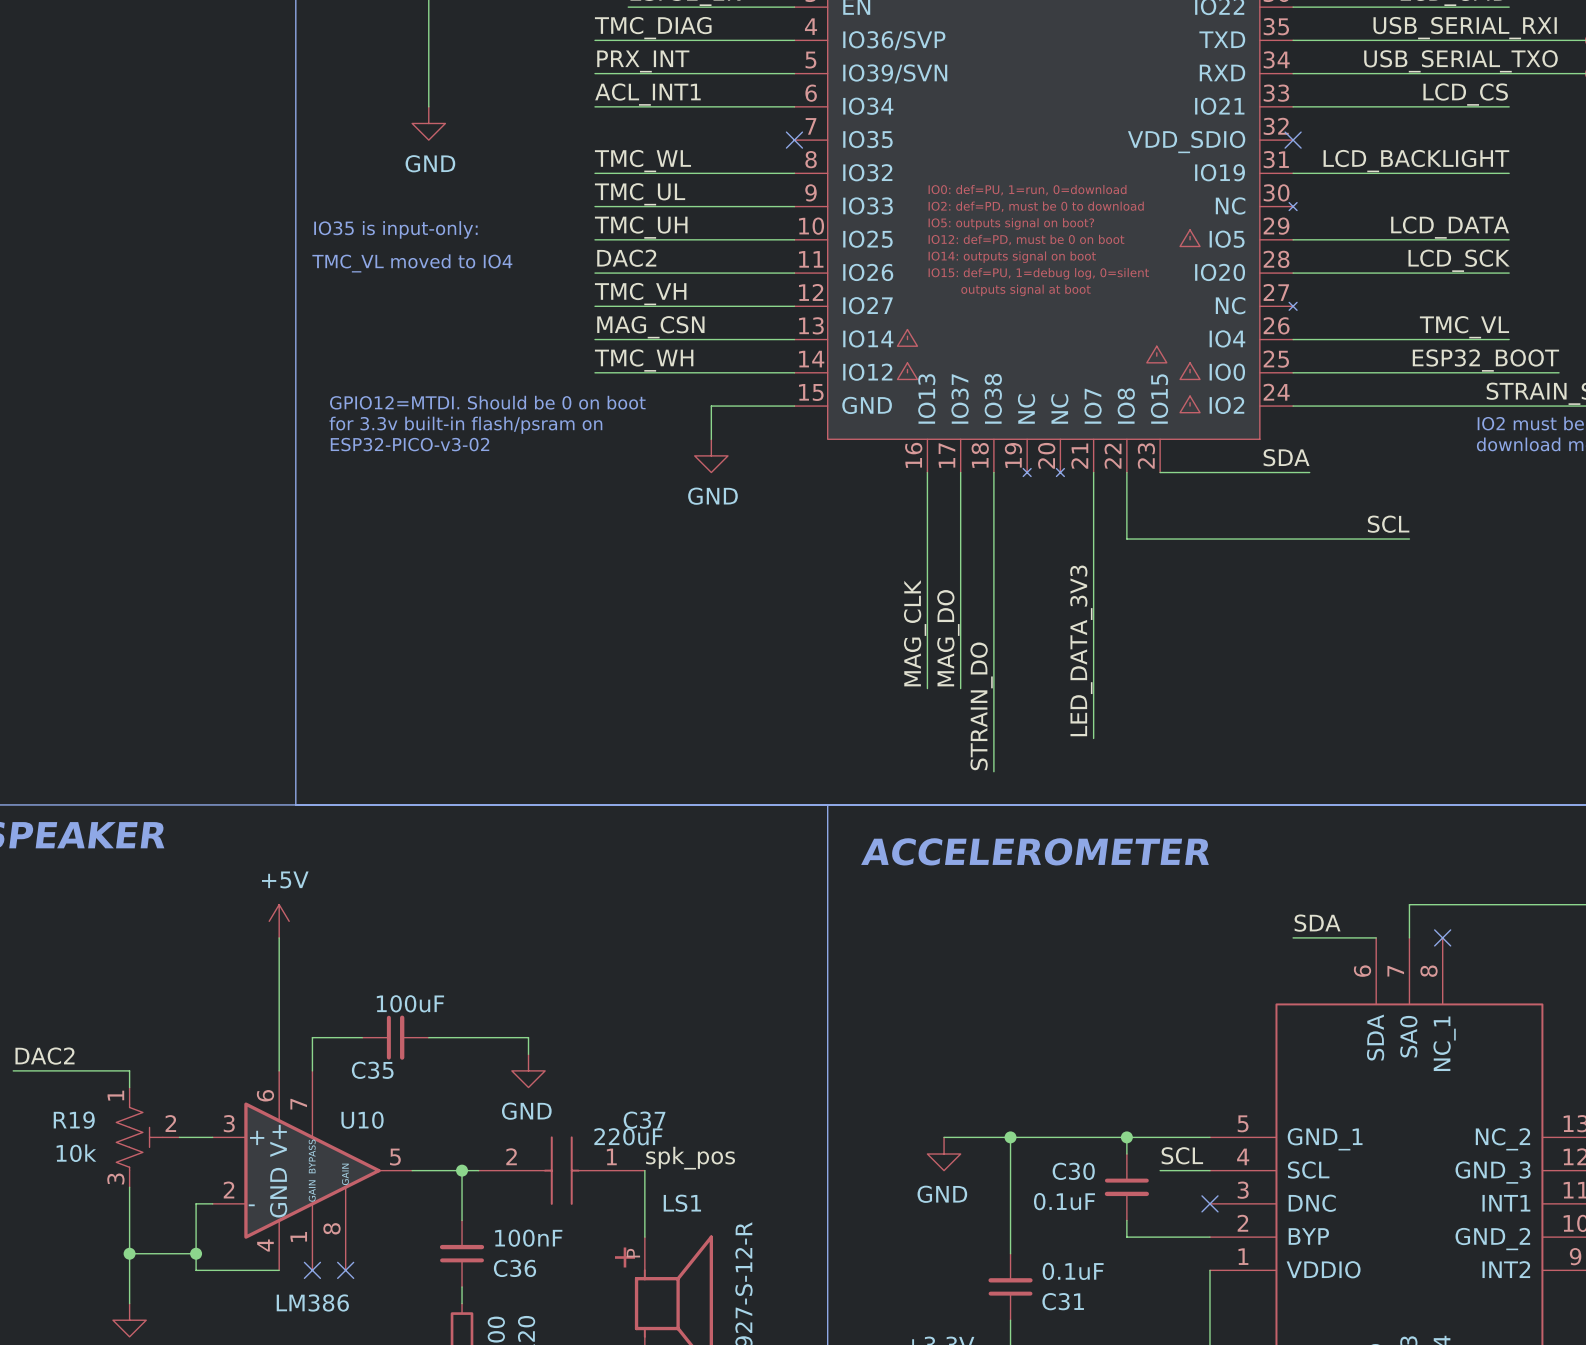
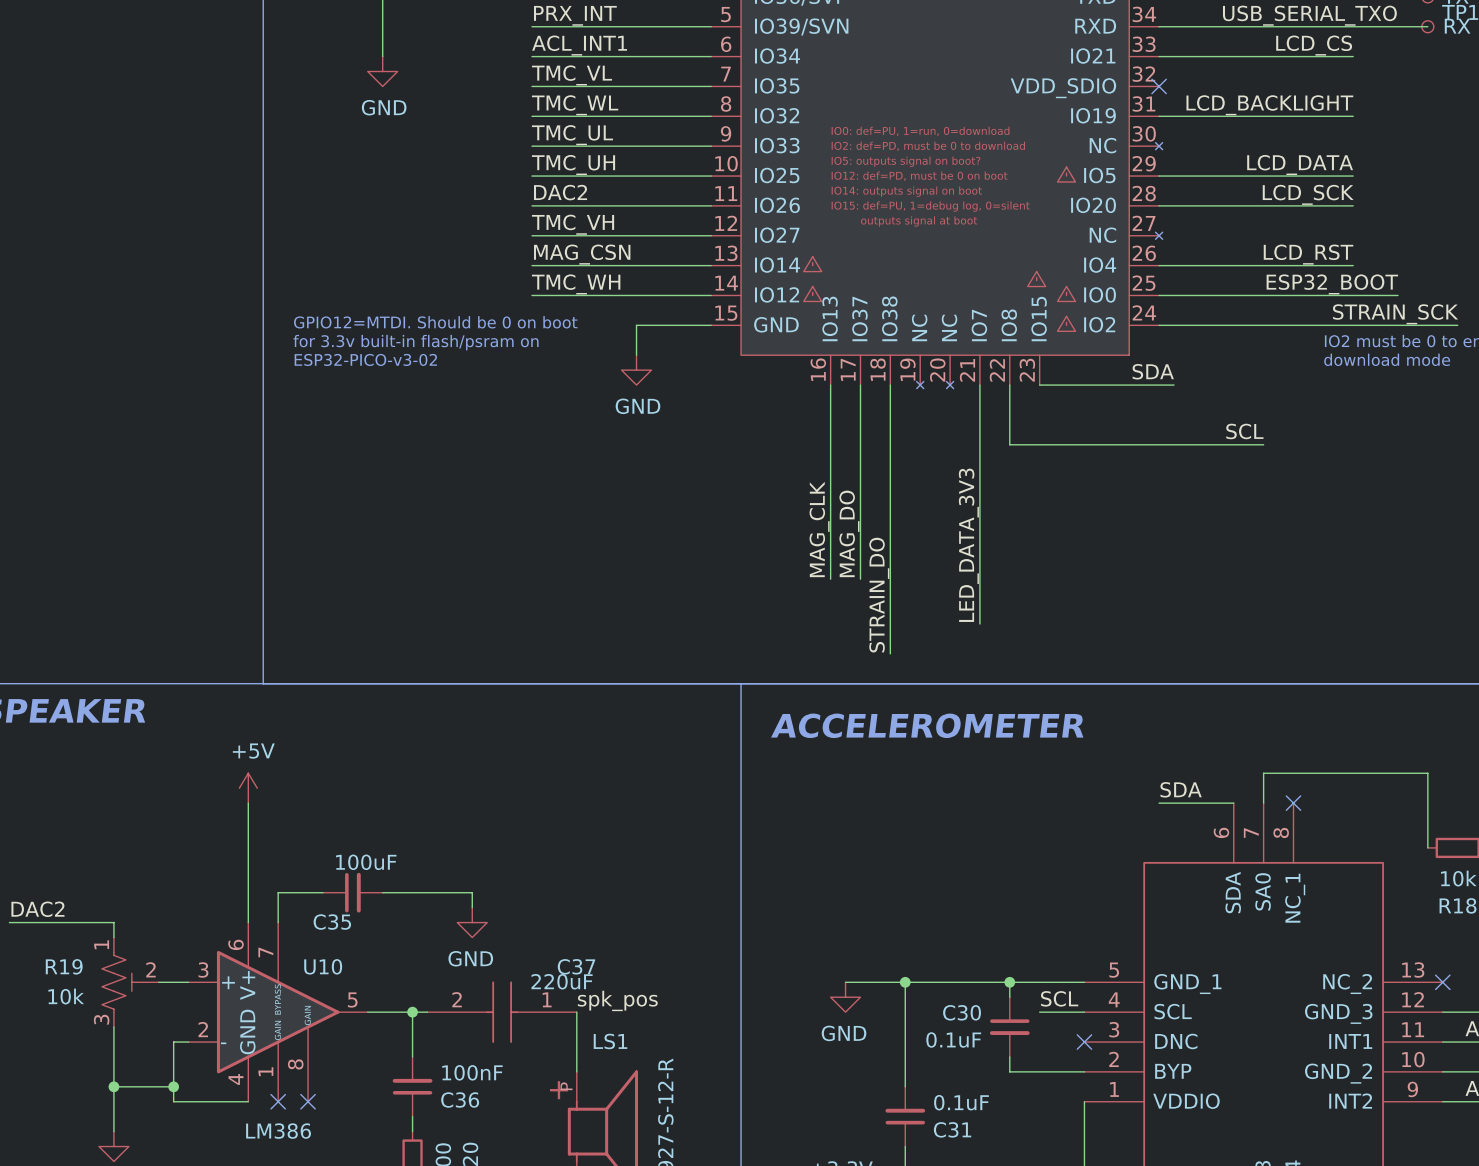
label: none -> TMC_VL (571, 75)
wire: none -> (532, 86) (711, 86)
no-connect mark: (794, 140) -> none
text: IO35 is input-only: (395, 229) -> none
text: TMC_VL moved to IO4 (412, 263) -> none
label: TMC_VL (1464, 327) -> LCD_RST (1308, 254)

